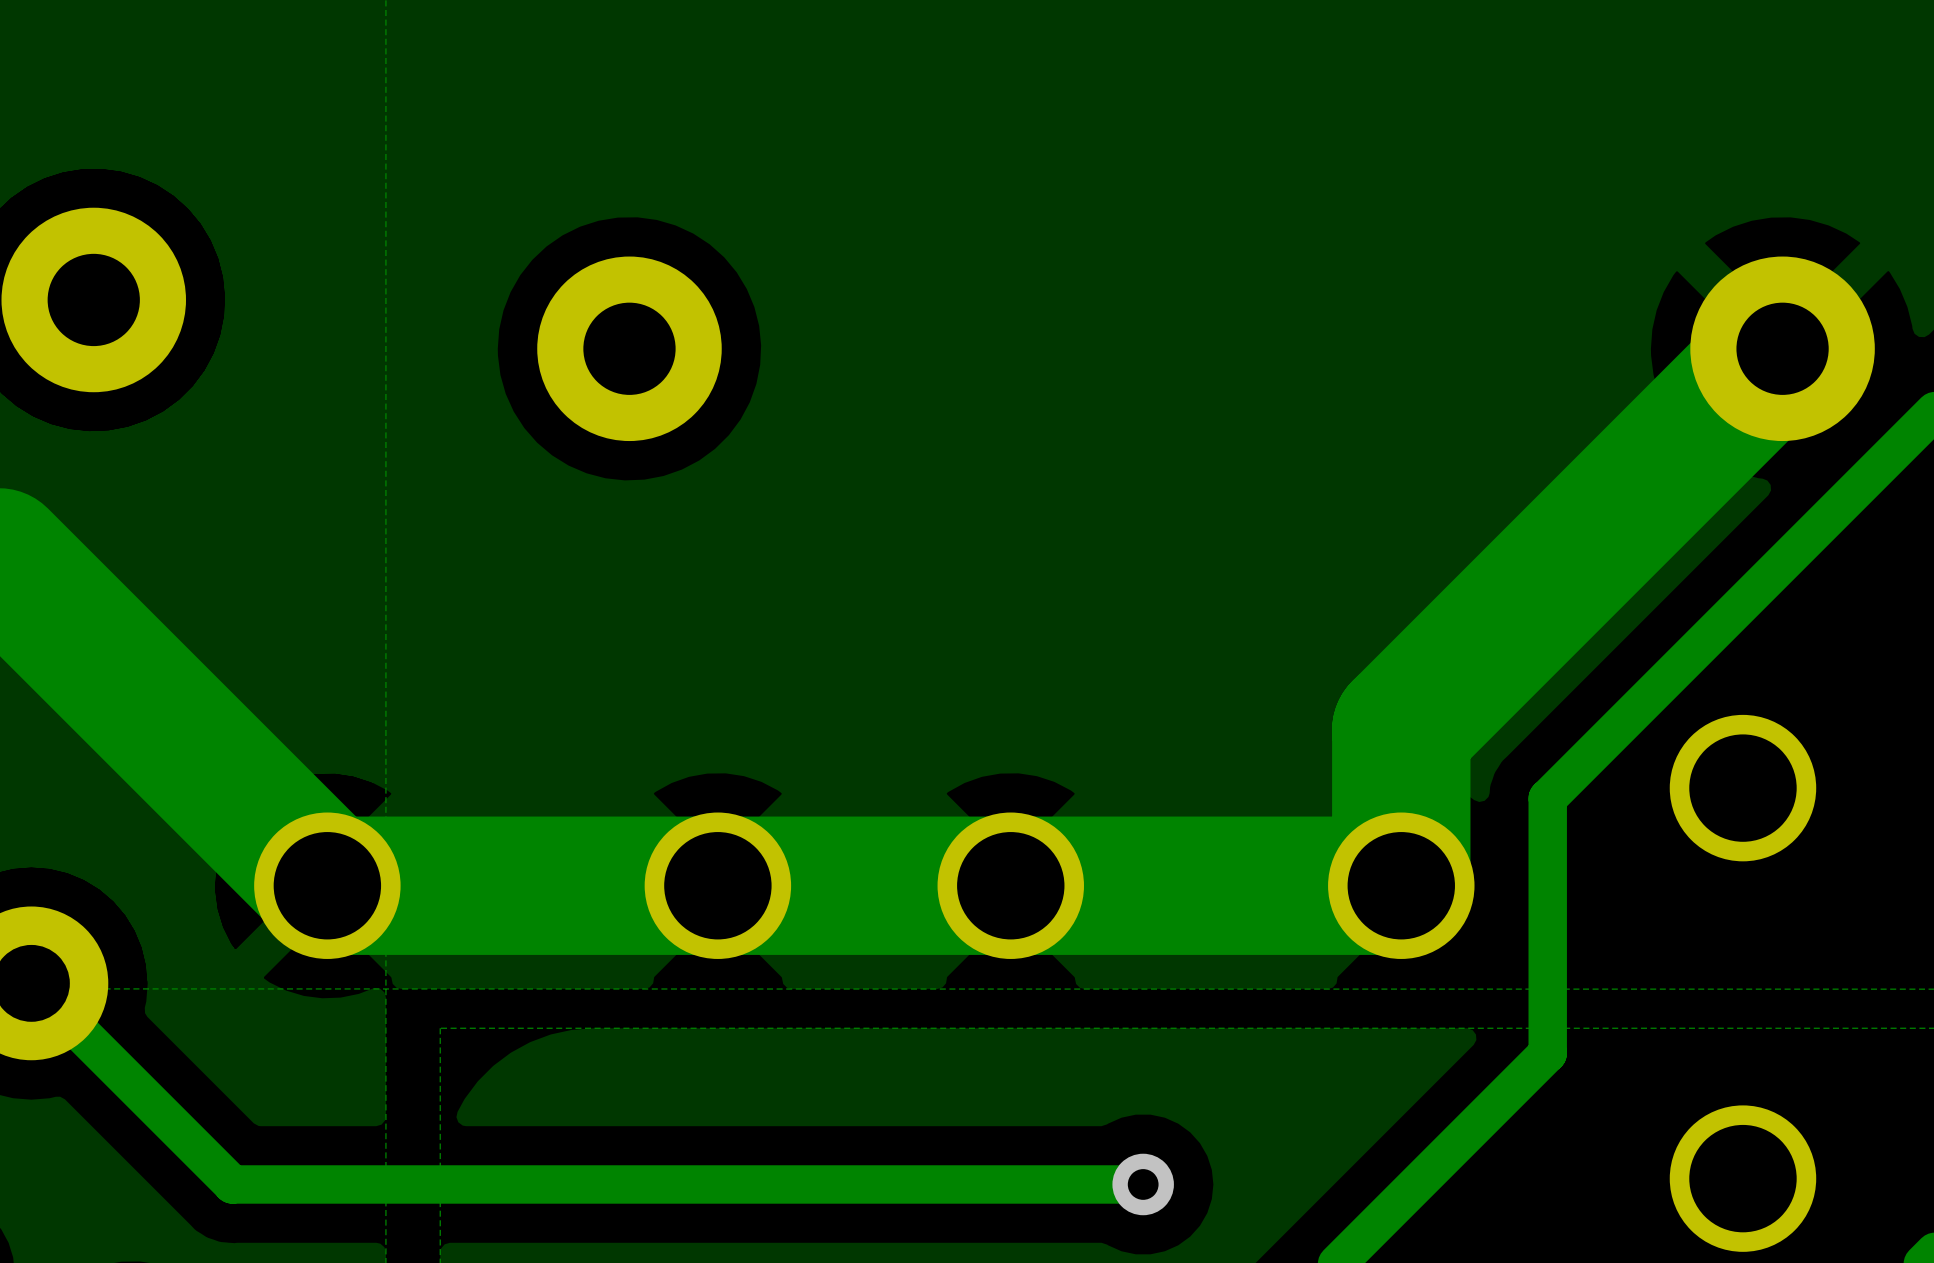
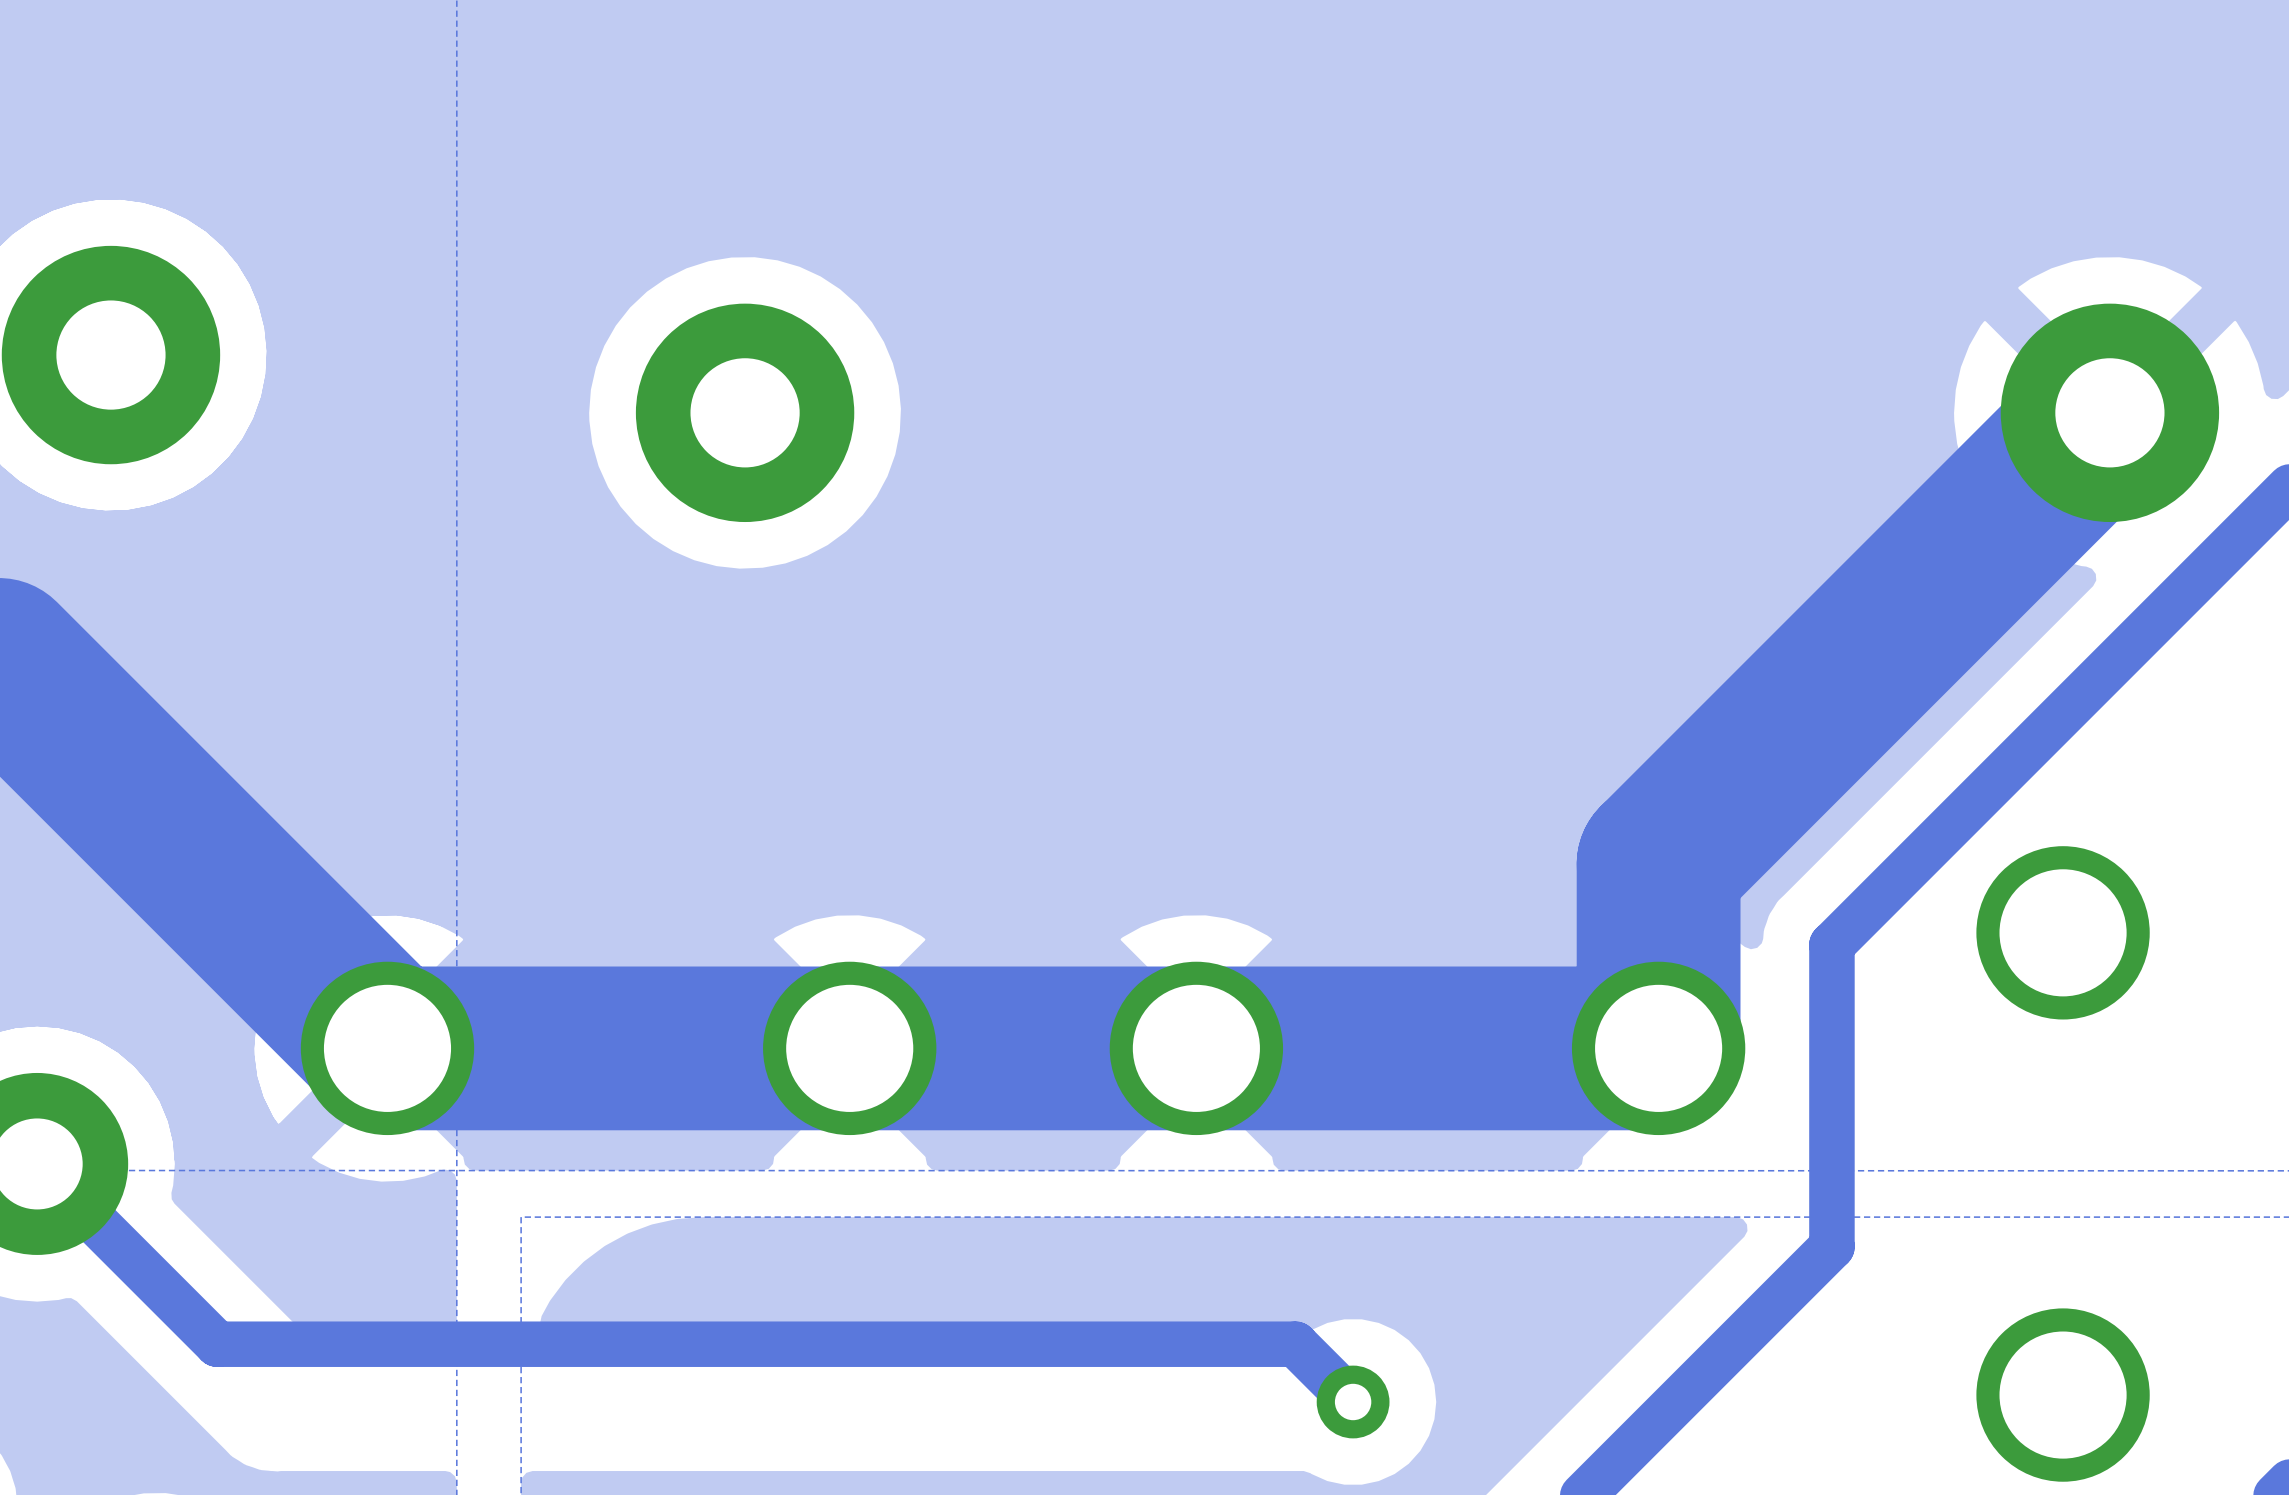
track: (183, 1135) (232, 1184) (1143, 1184) -> (217, 1344) (1295, 1344) (1353, 1402)

